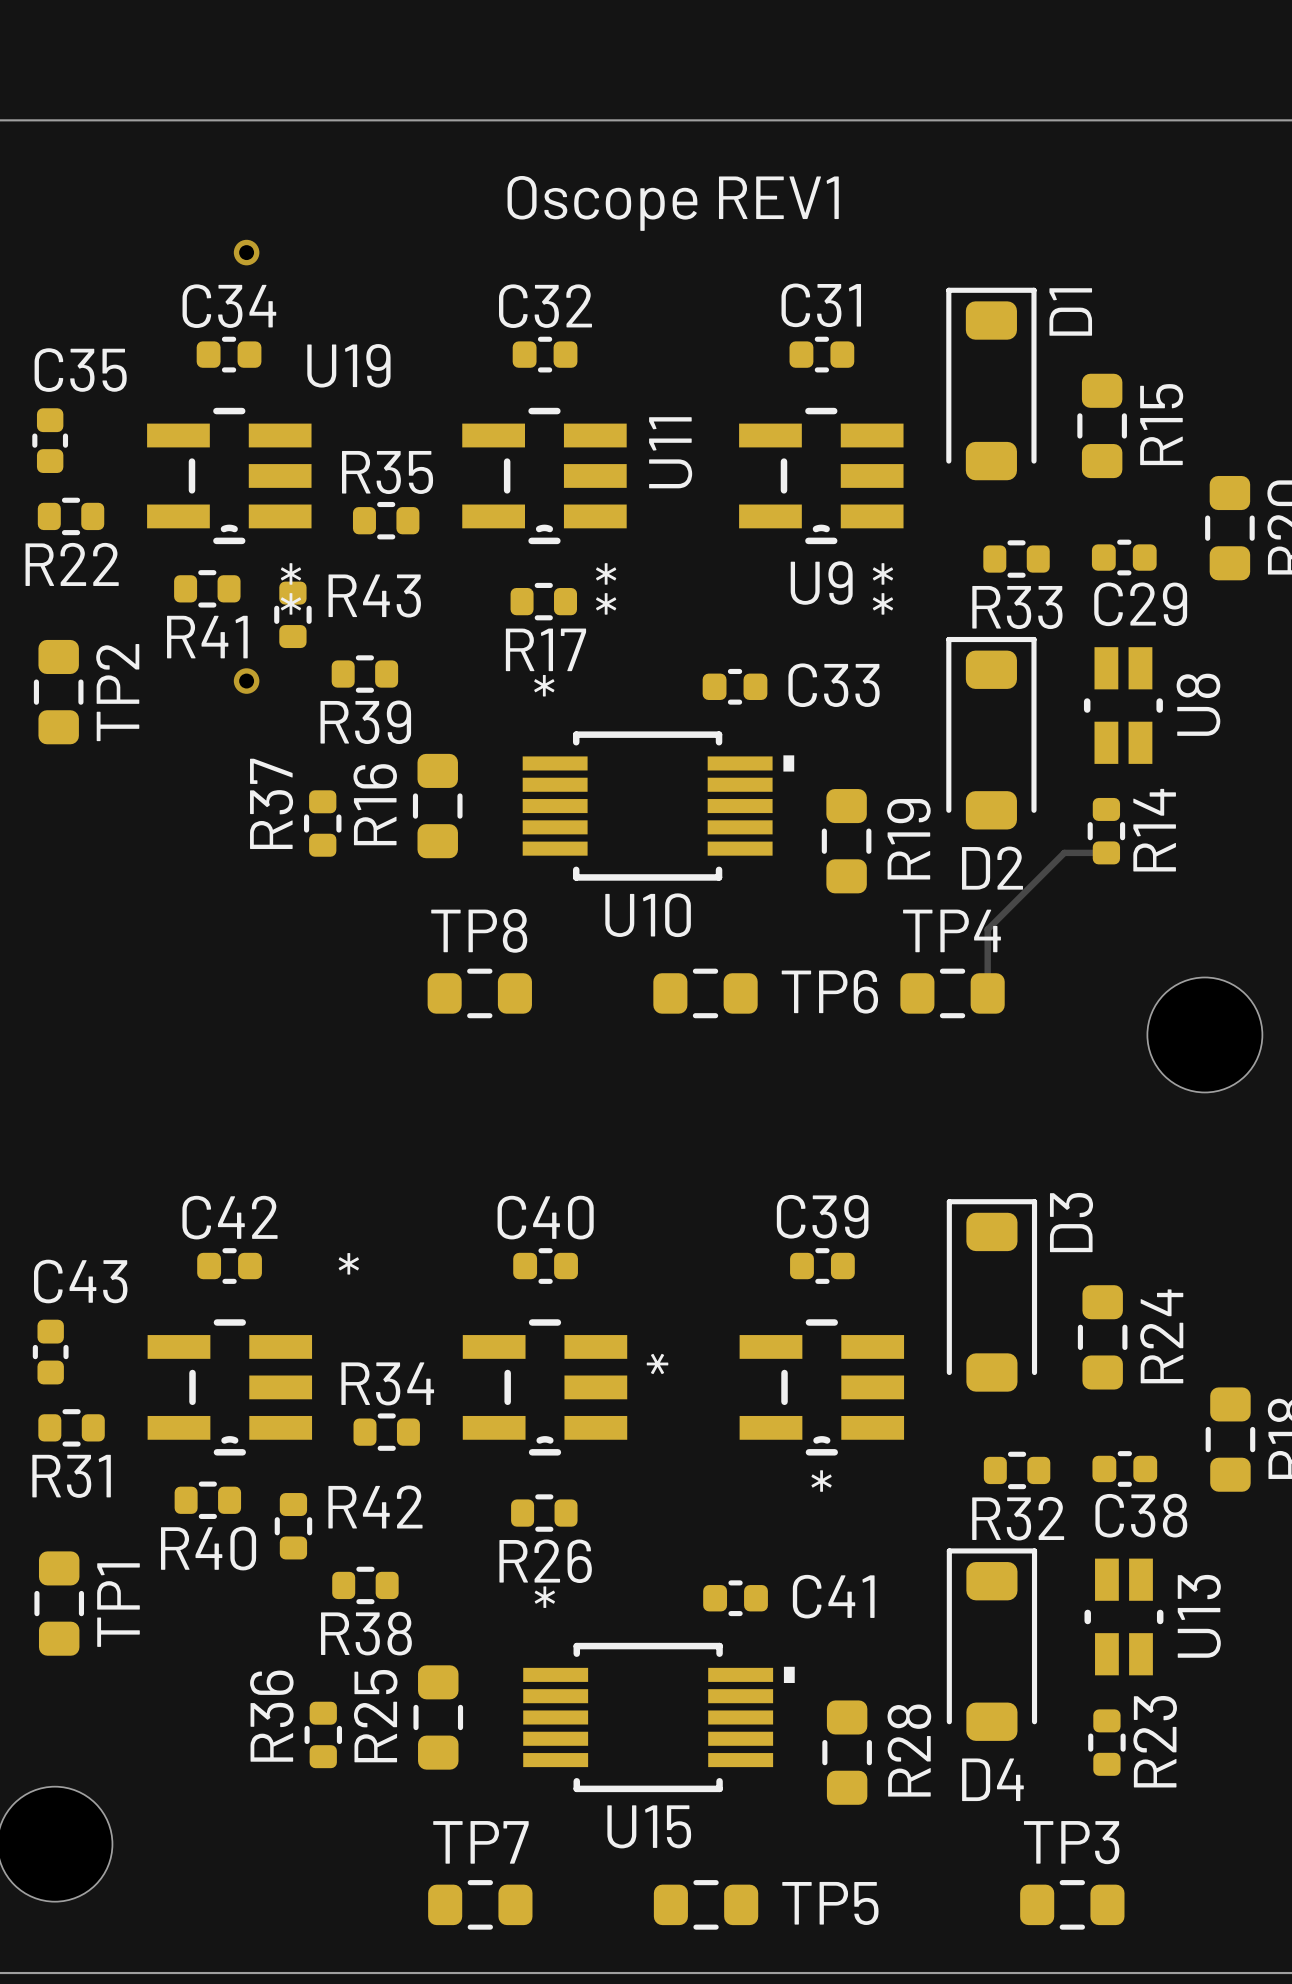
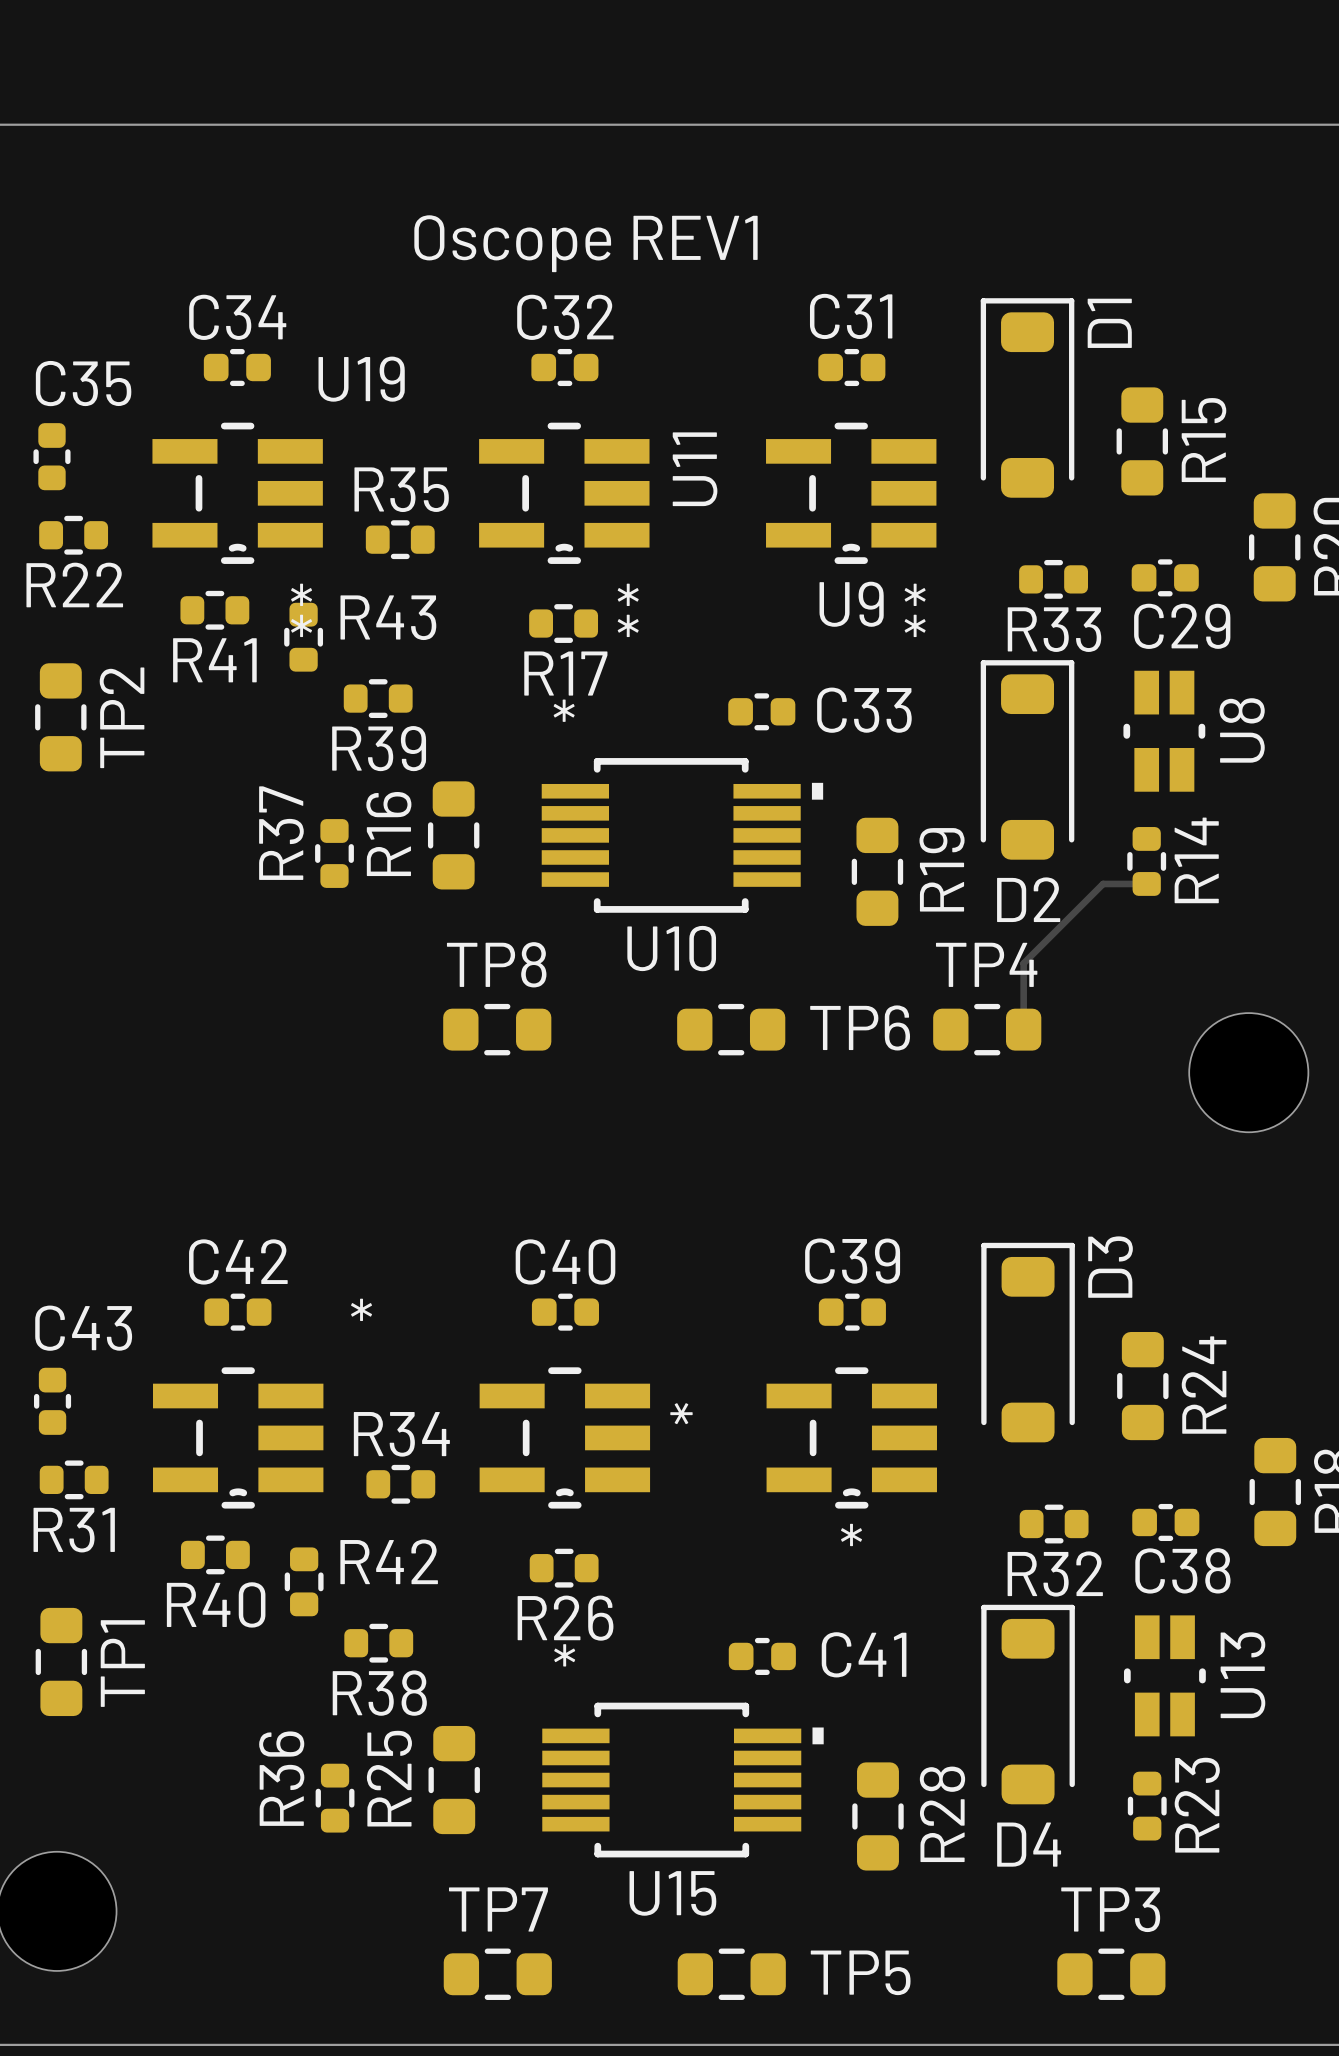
text position: Oscope REV1 (673, 203) -> Oscope REV1 (585, 243)
via: (246, 252) -> none
via: (246, 681) -> none

